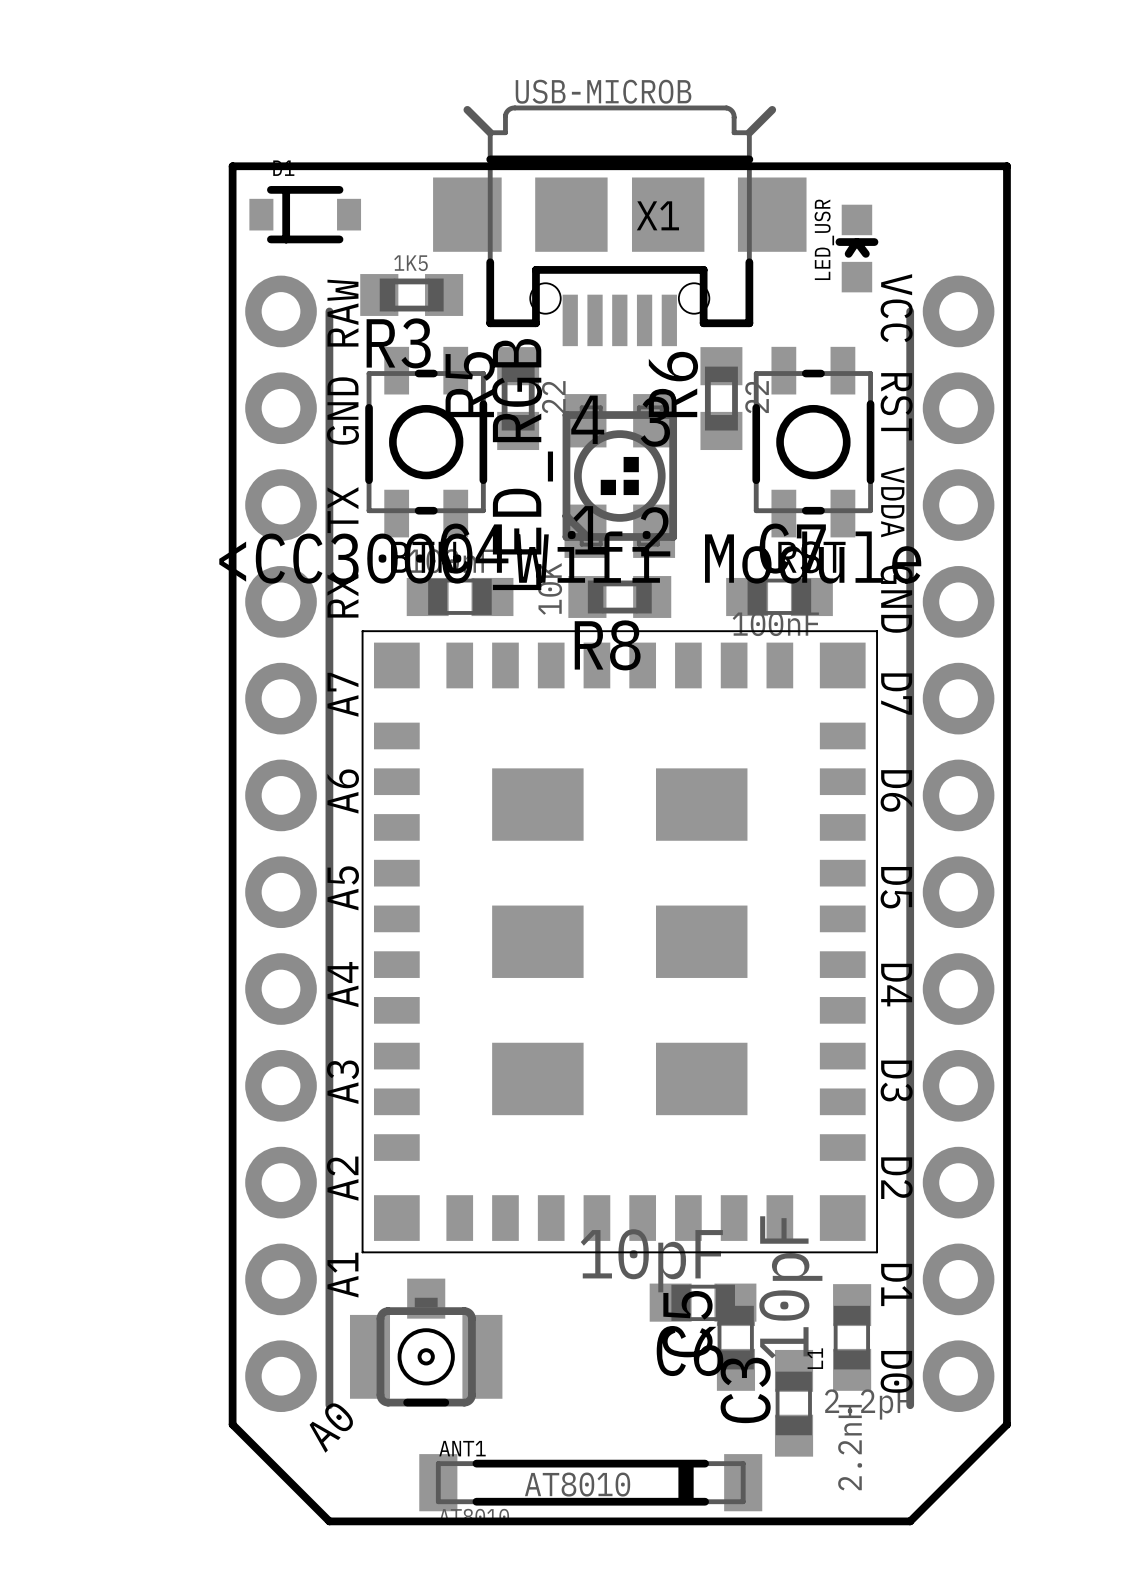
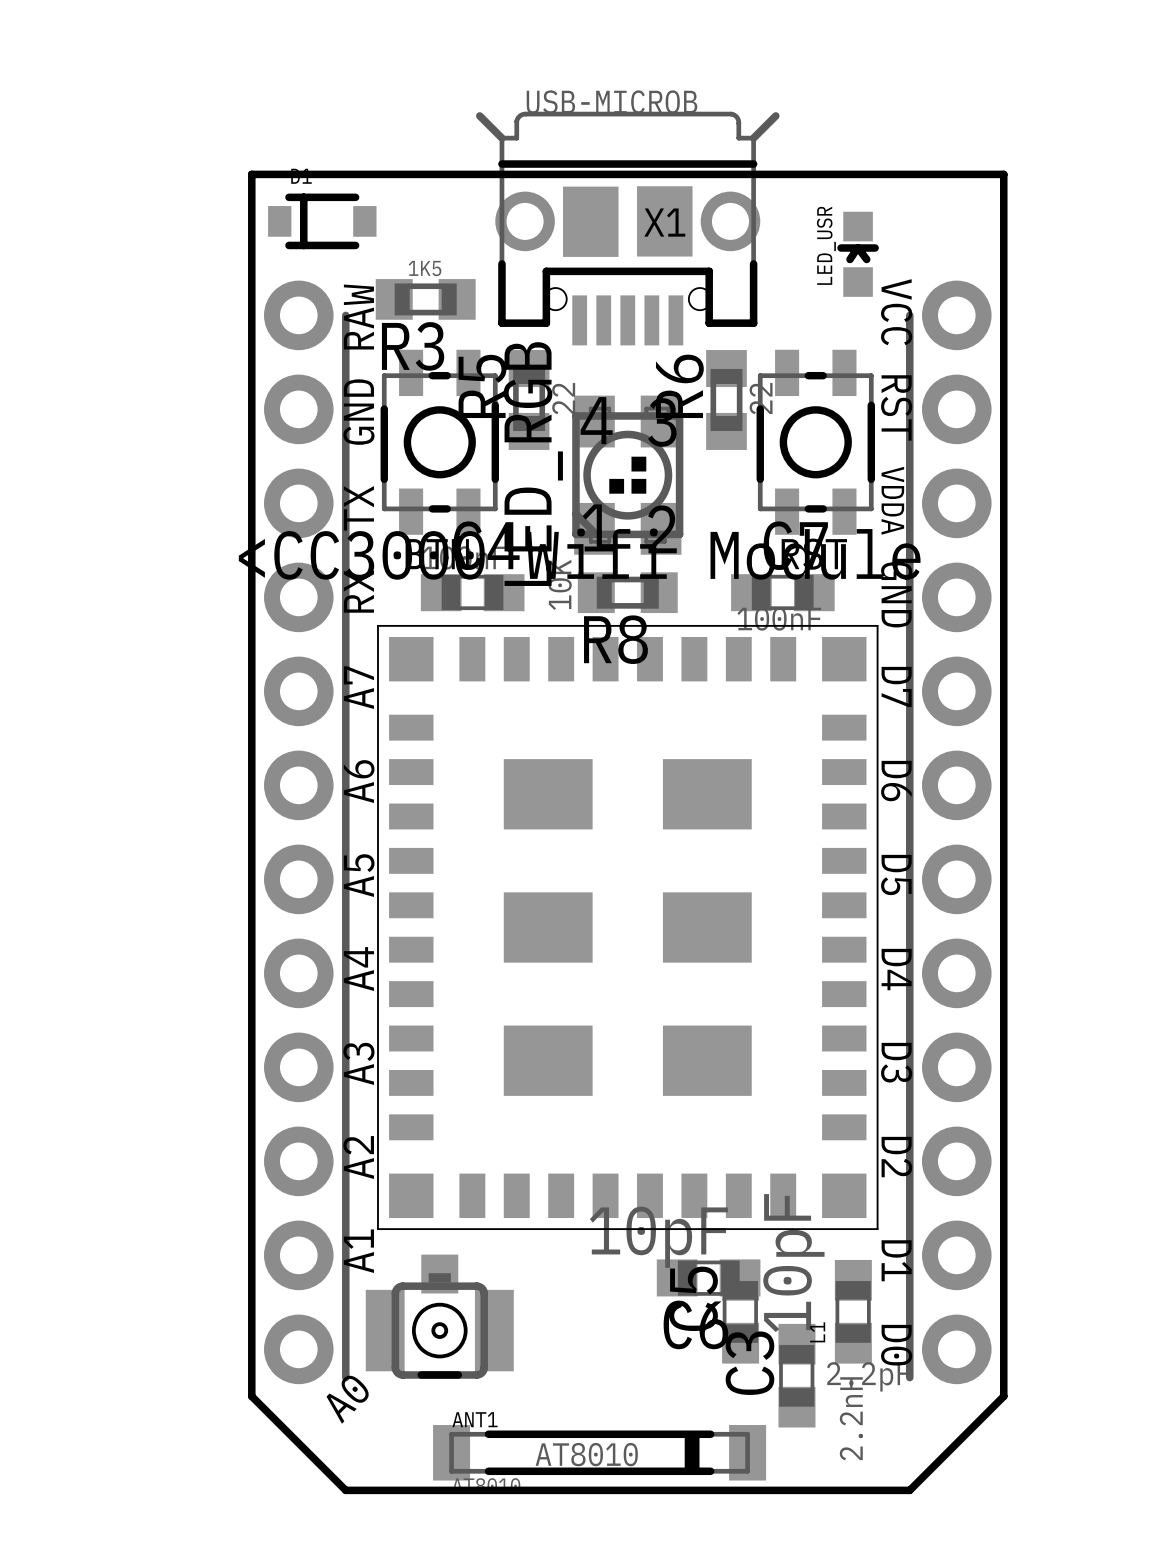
X1 footprint: [433, 105, 807, 347] -> [475, 111, 780, 346]

